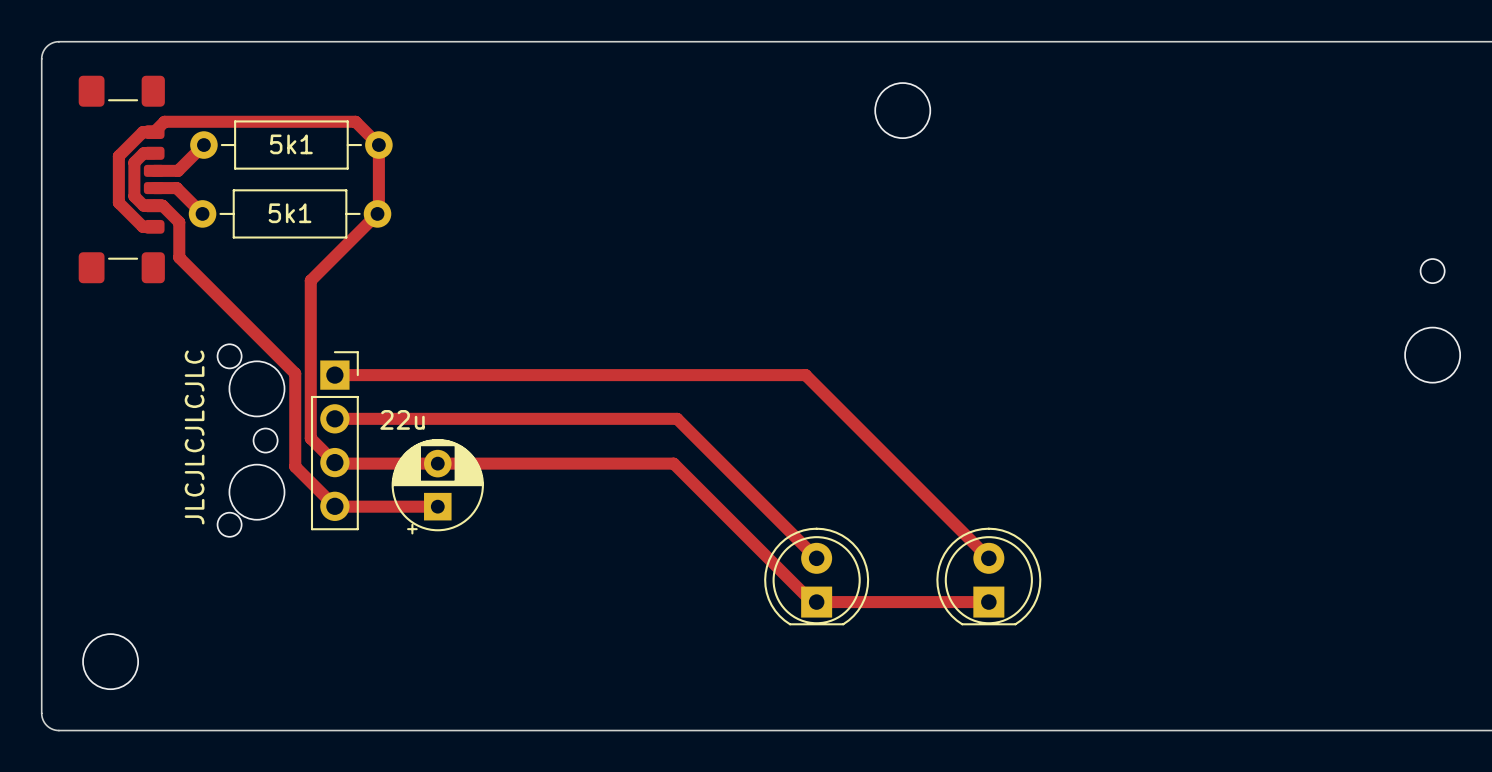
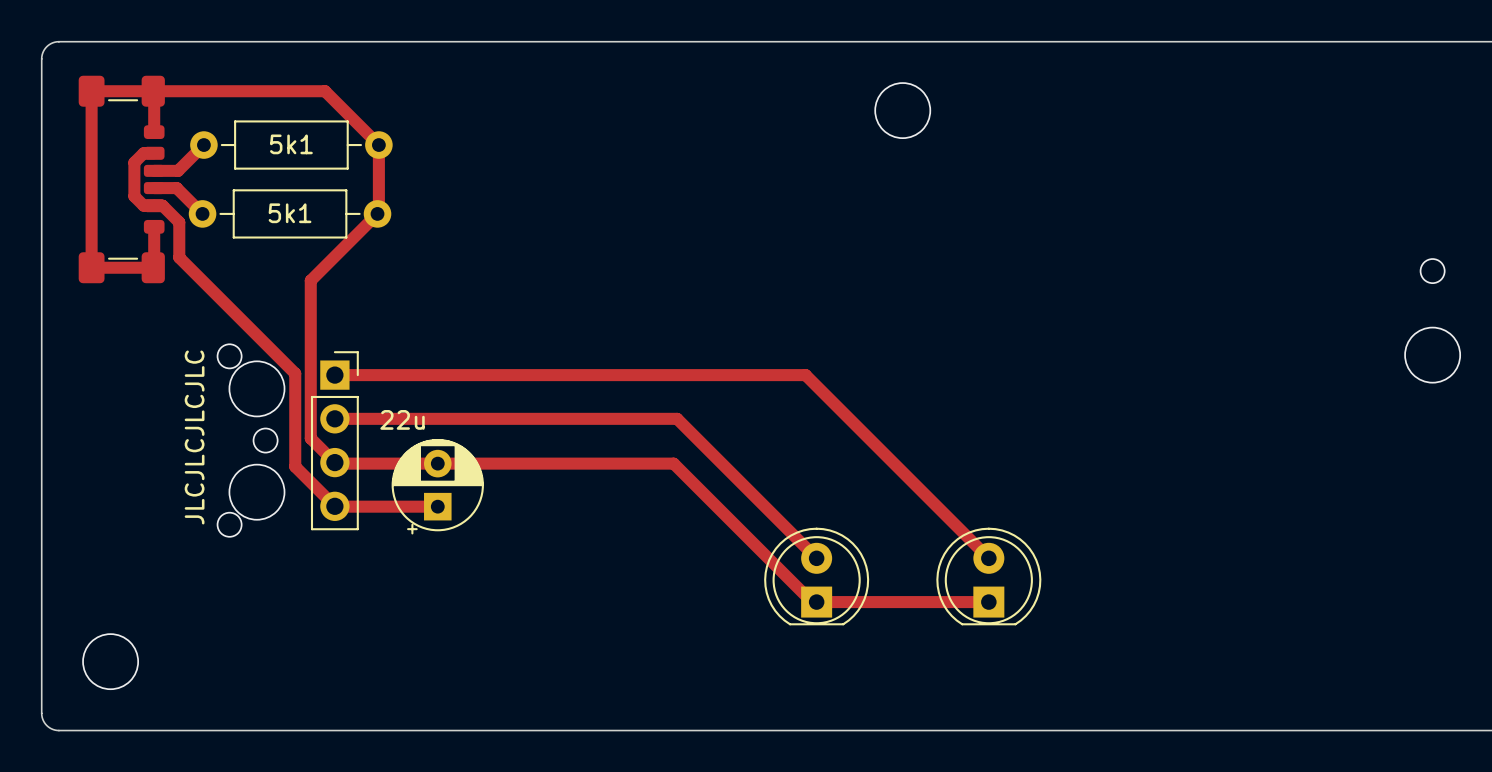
top track: none -> (154, 92) (154, 132)
top track: (355, 121) (164, 121) (154, 132) (142, 132) (118, 156) (118, 202) (142, 226) (154, 226) -> (355, 121) (325, 91) (91, 91) (91, 267) (153, 267)
top track: none -> (154, 226) (154, 266)

